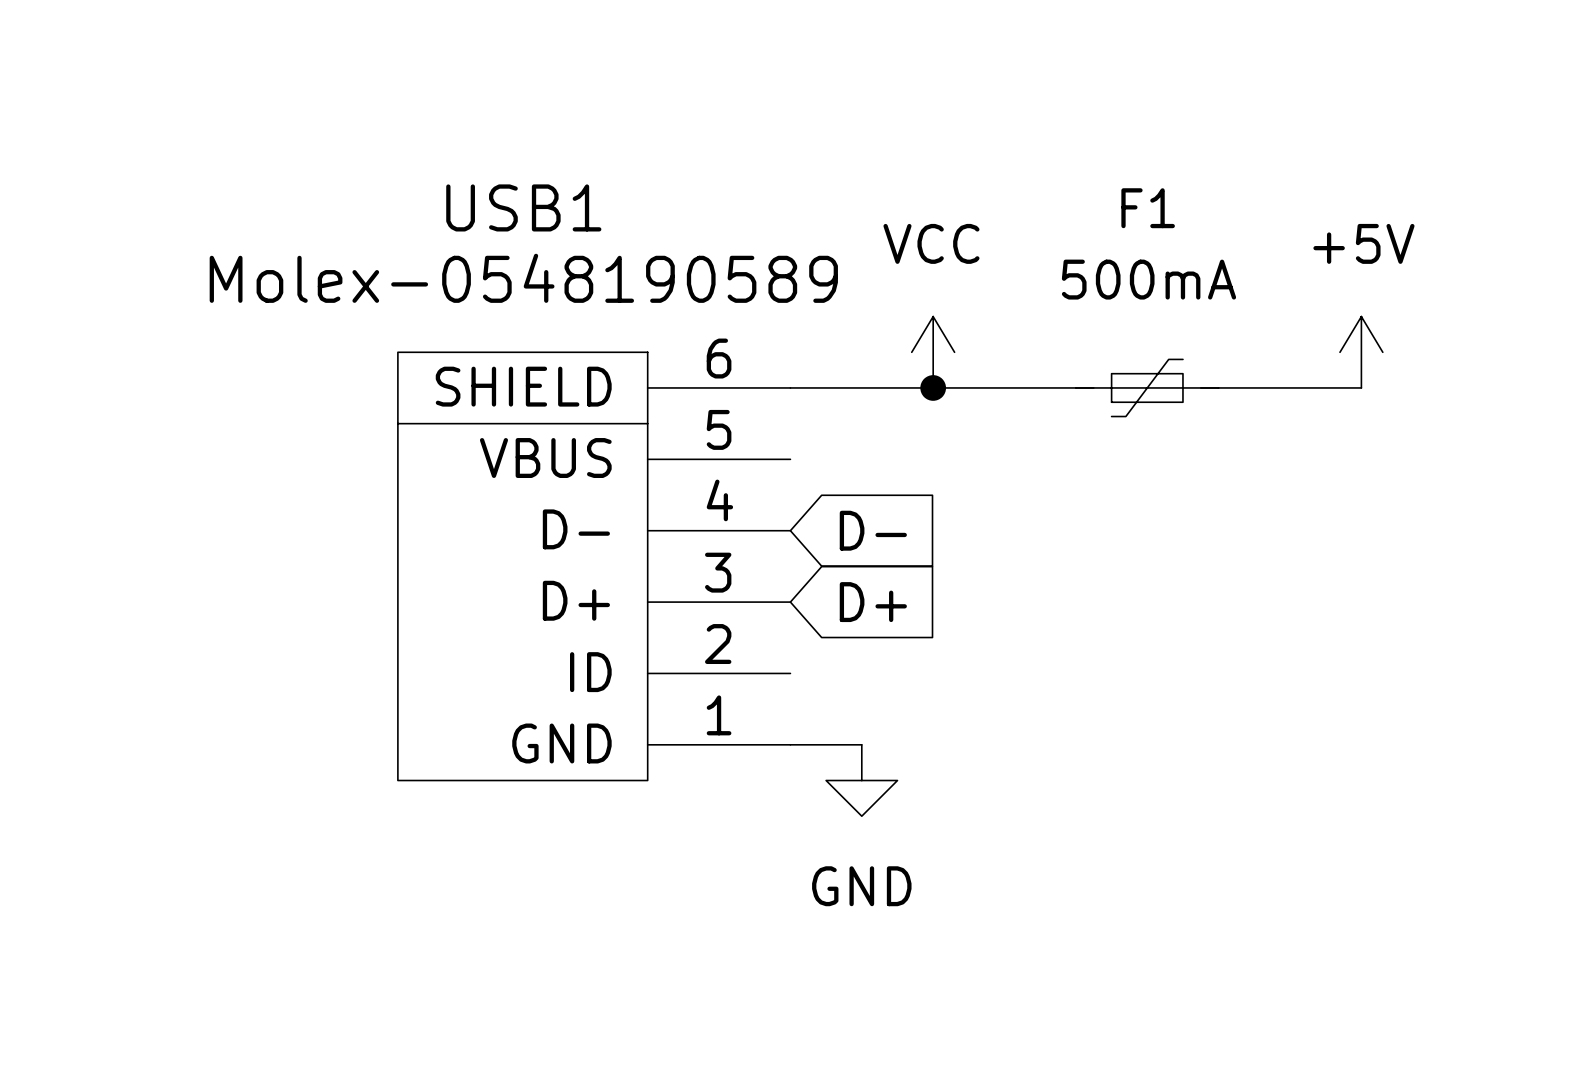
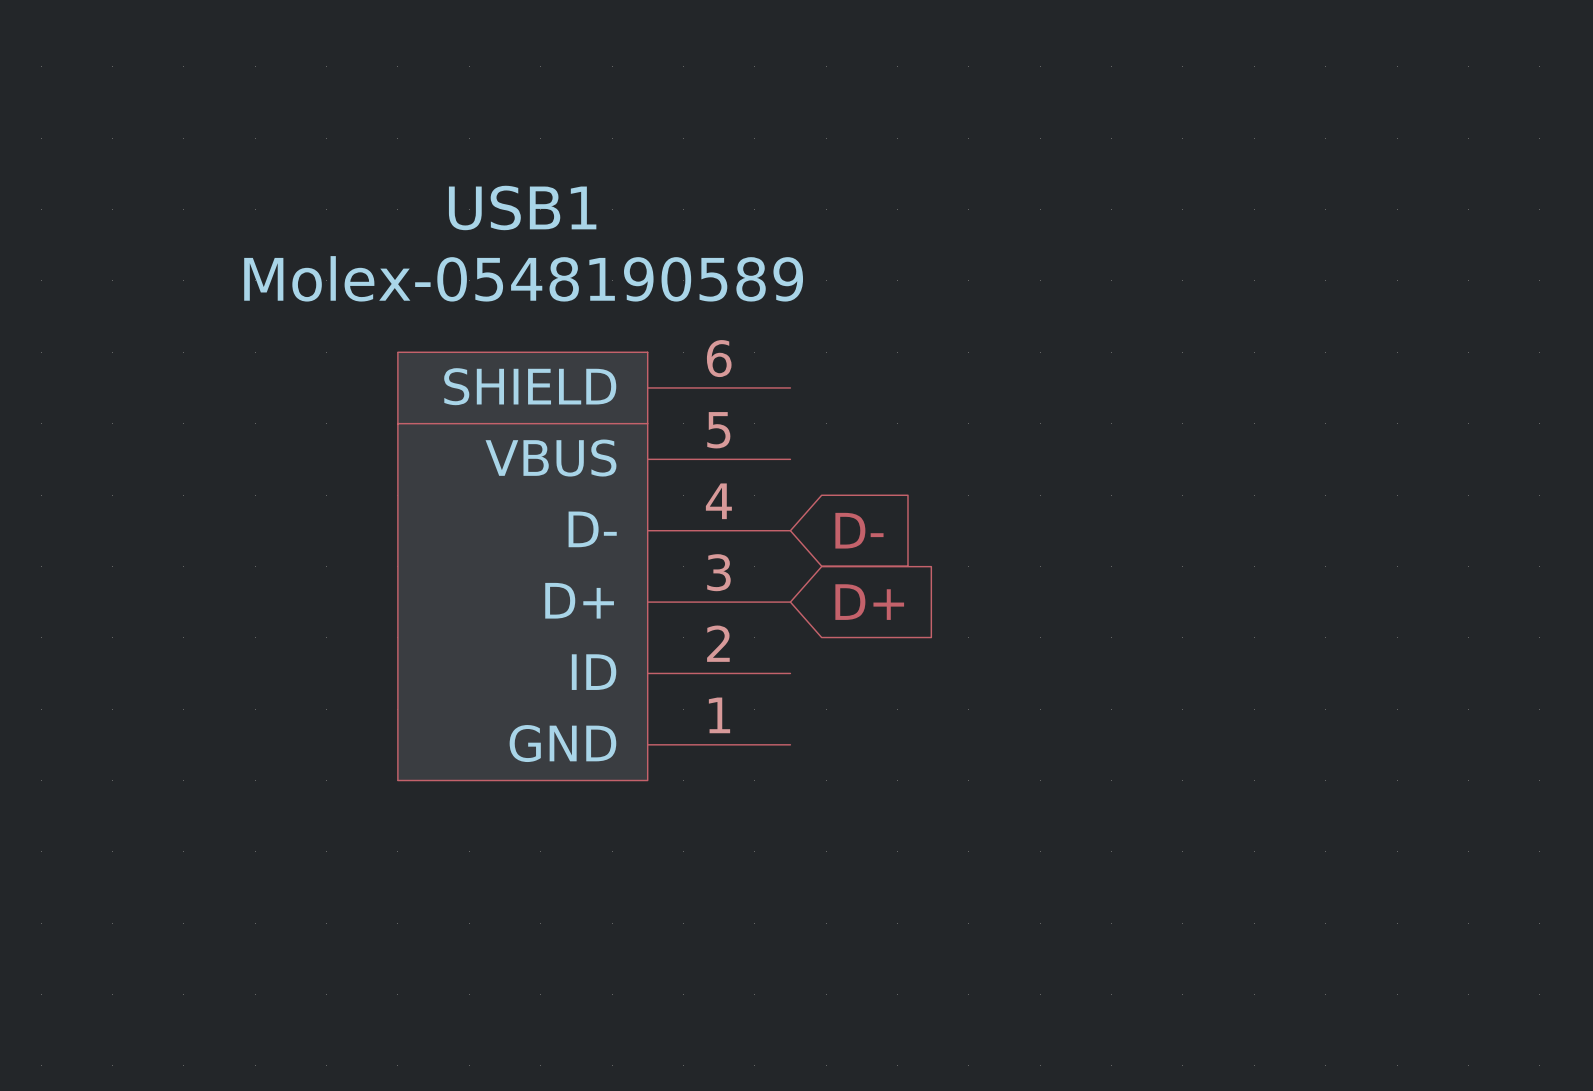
power symbol: VCC (933, 352) -> none
power symbol: +5V (1361, 352) -> none
wire: (790, 387) (1075, 387) -> none
junction: (933, 387) -> none
F1: 500mA (1147, 387) -> none
wire: (1218, 387) (1361, 387) -> none
wire: (790, 744) (861, 744) -> none
power symbol: GND (861, 780) -> none

